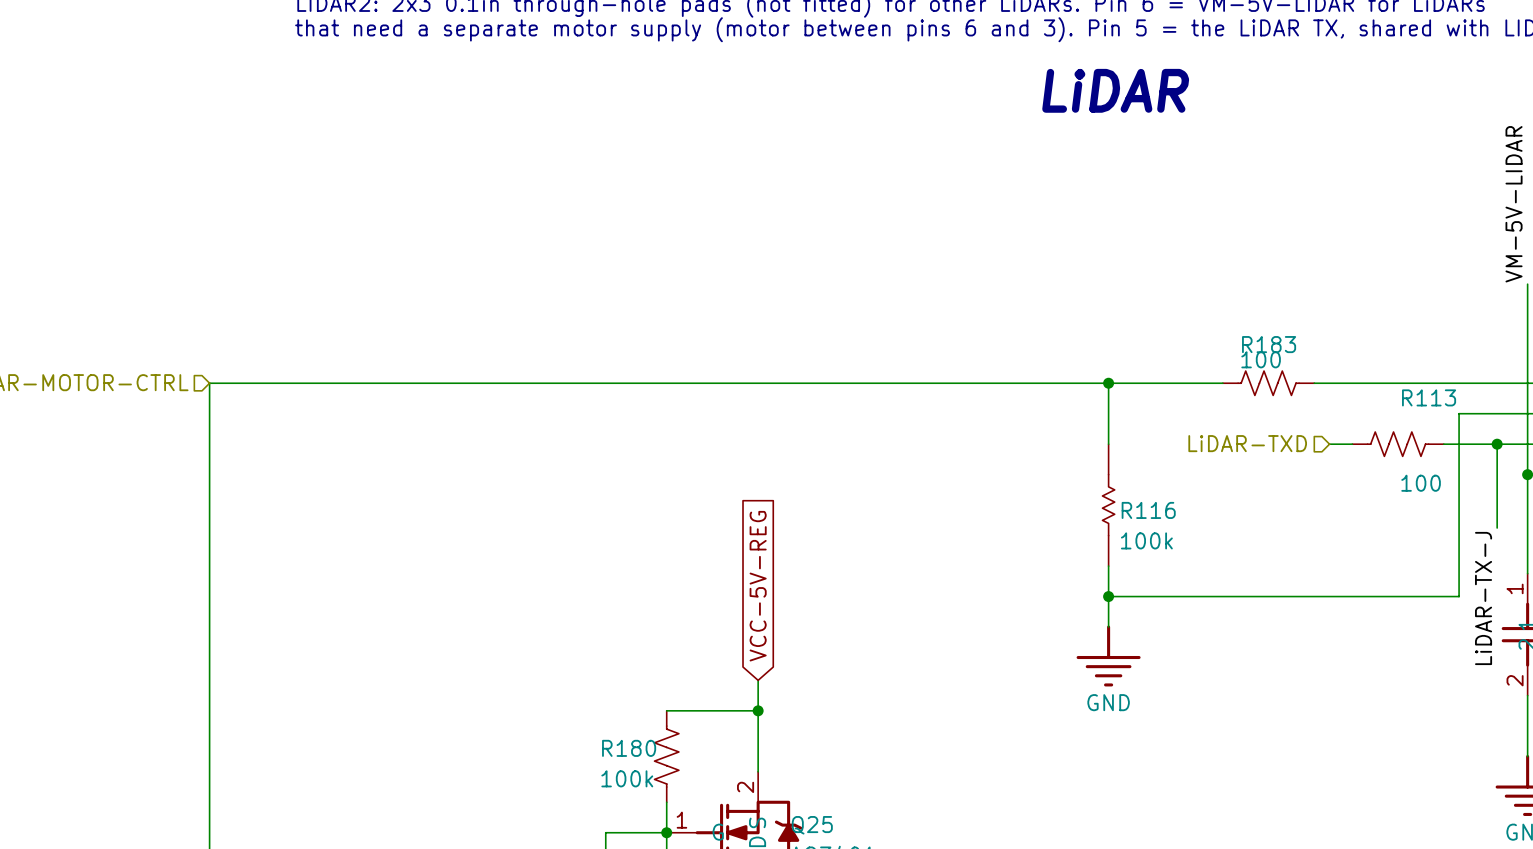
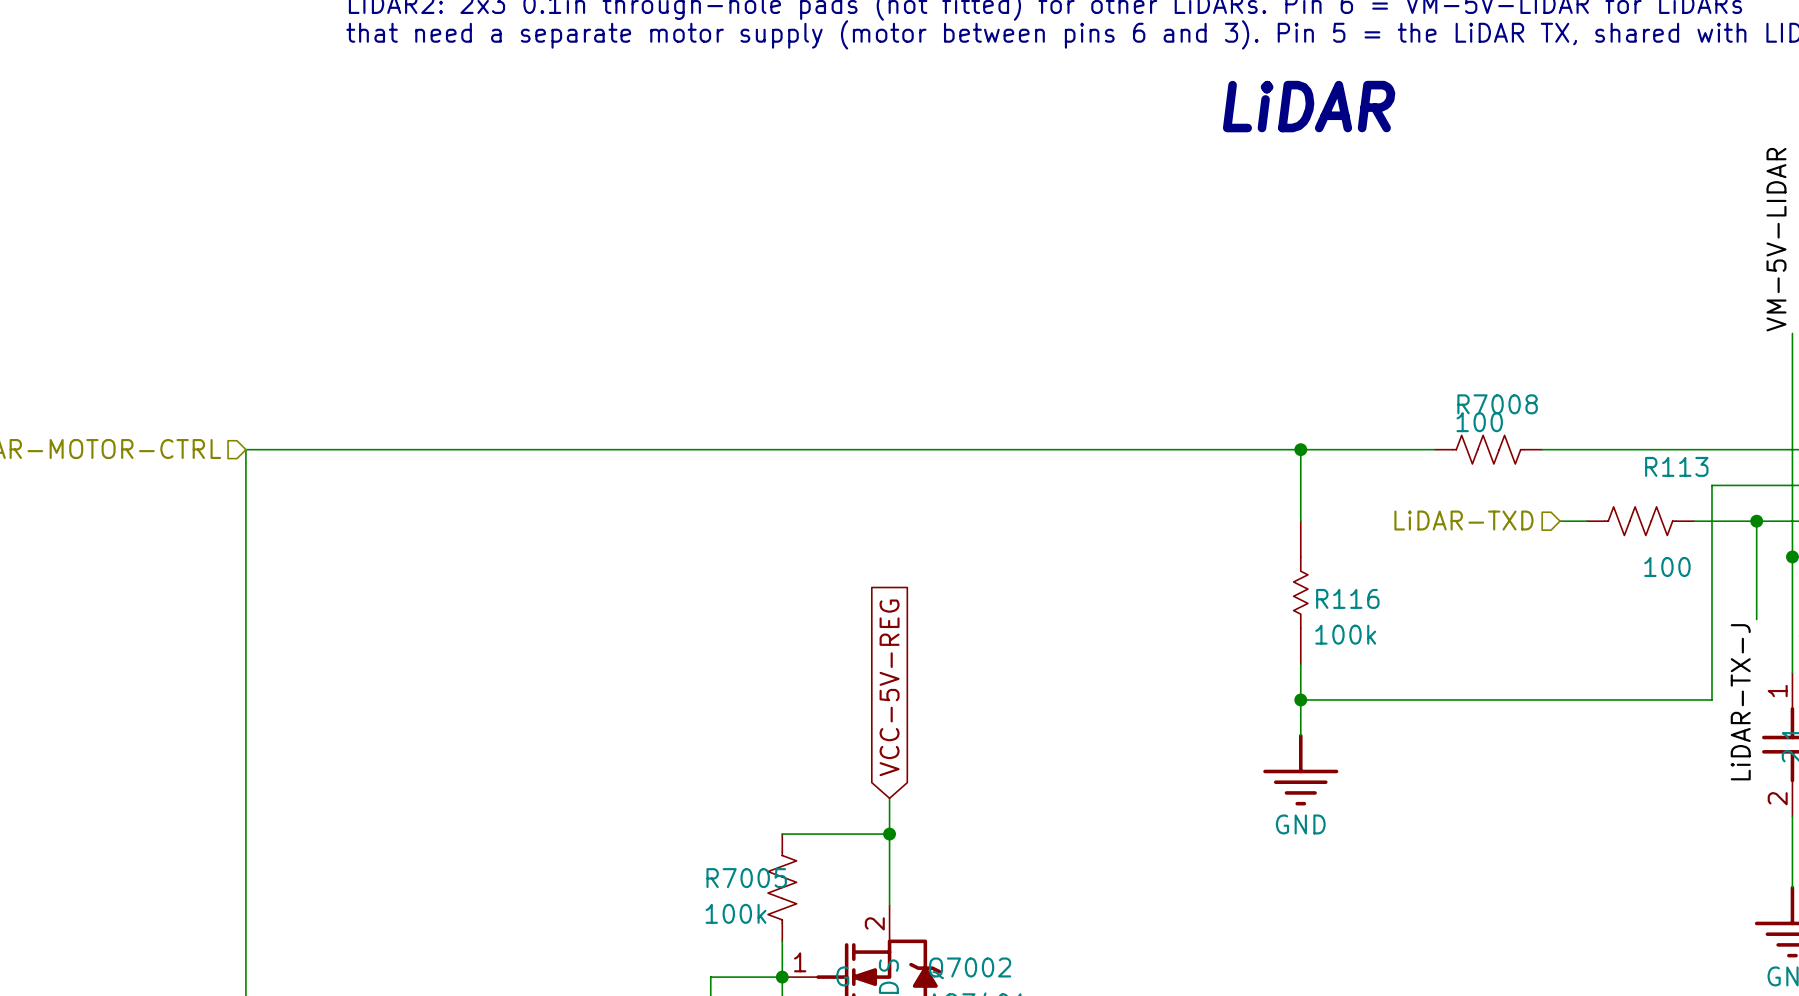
R183 name: R183 (1269, 344) -> R7008 (1497, 404)
R180 name: R180 (629, 748) -> R7005 (746, 878)
Q25 name: Q25 (812, 825) -> Q7002 (970, 968)

